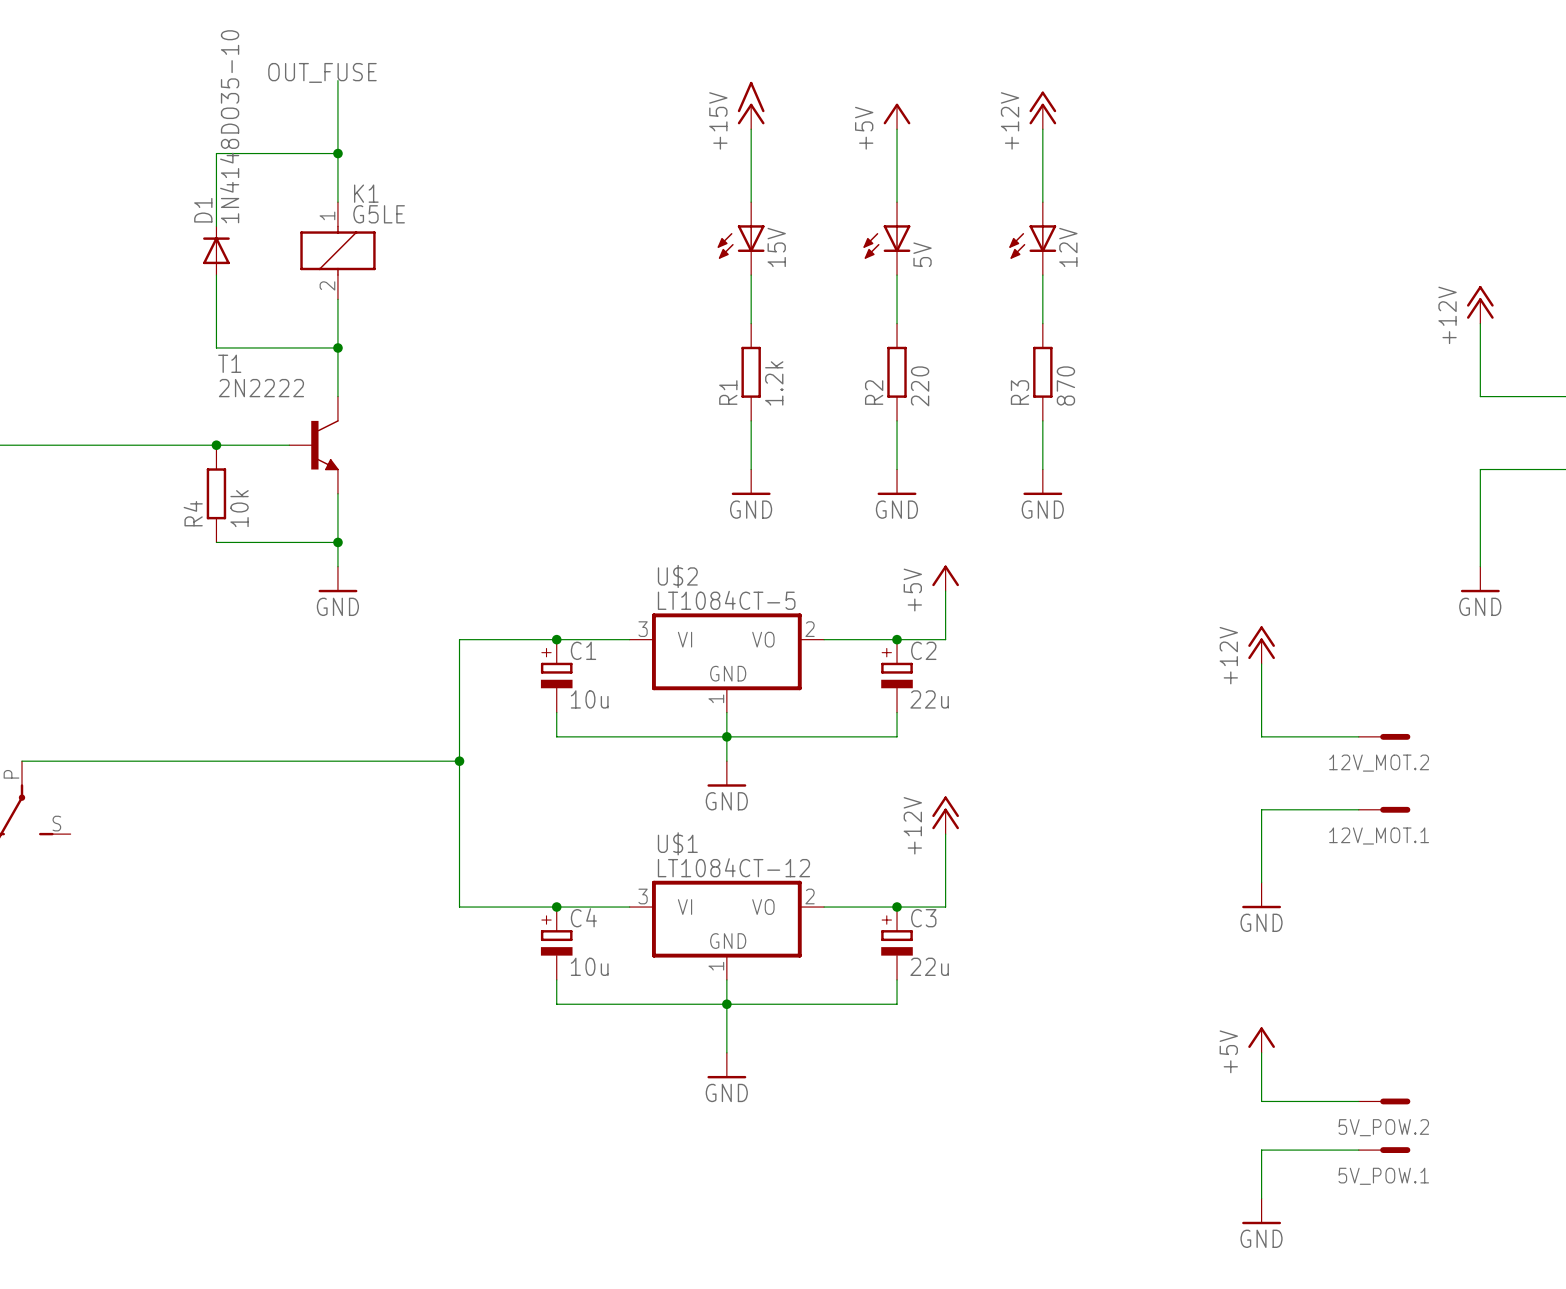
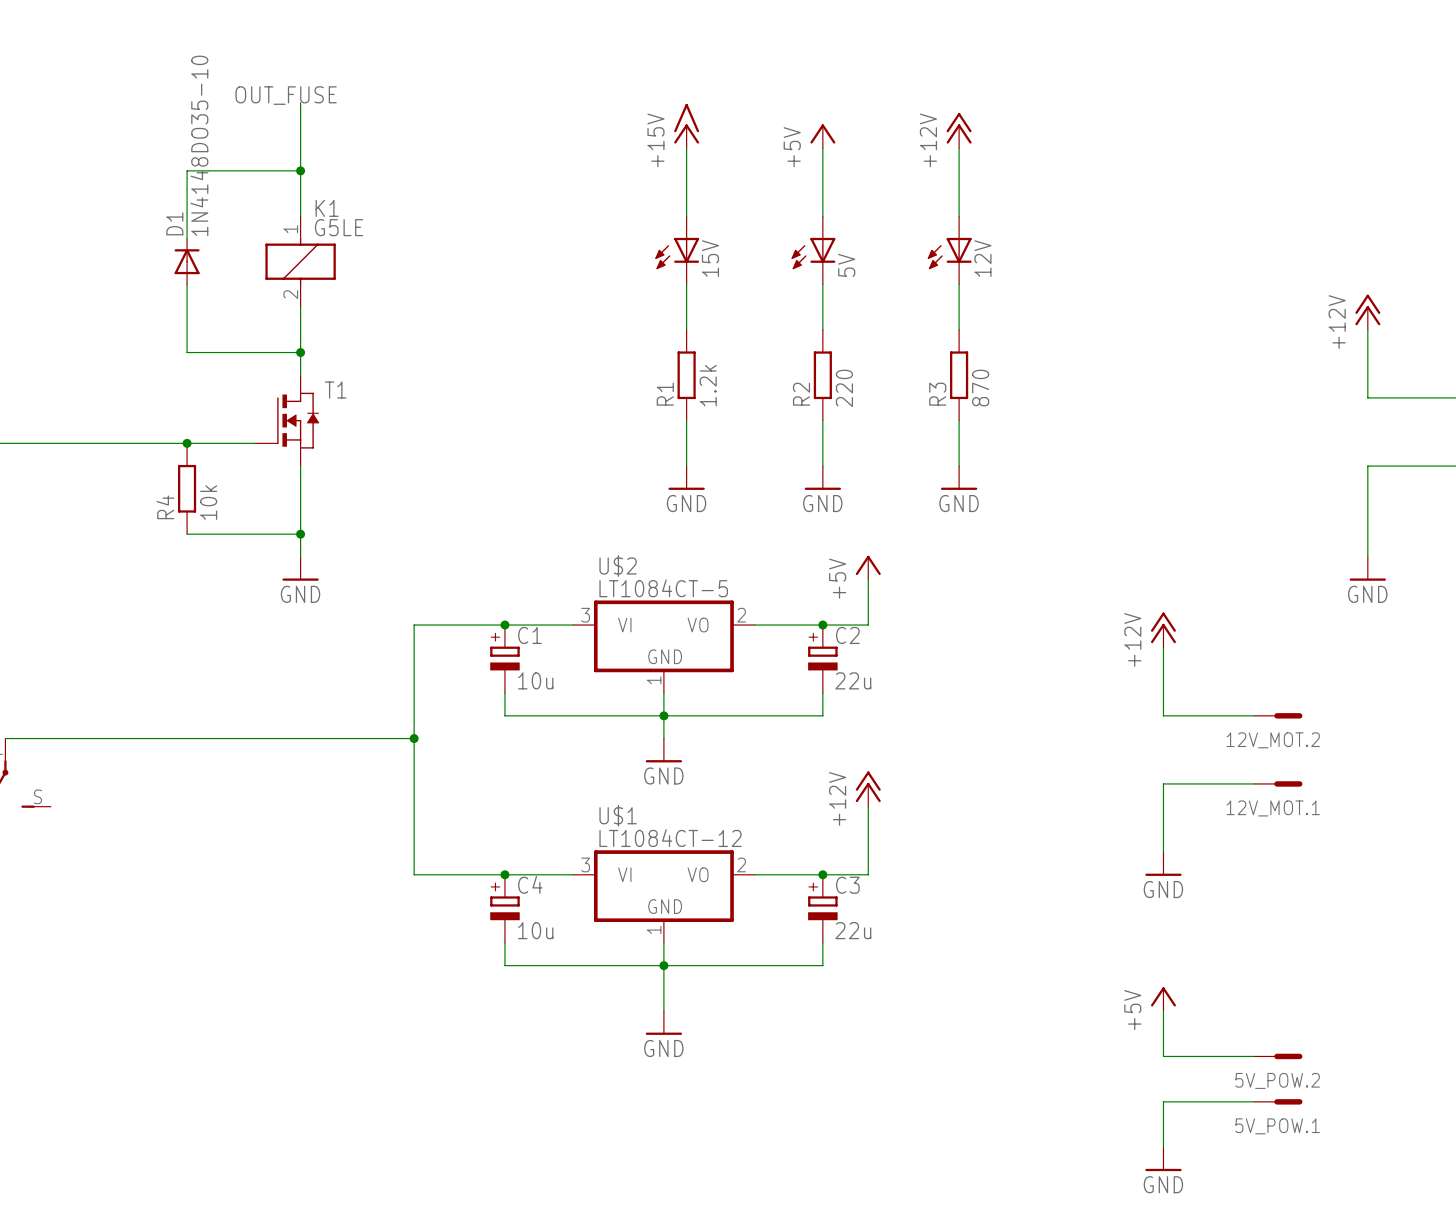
T1 name position: T1 (229, 363) -> T1 (335, 390)
T1 value: 2N2222 (261, 388) -> none
T1 symbol: [289, 396, 339, 494] -> [255, 375, 320, 467]

